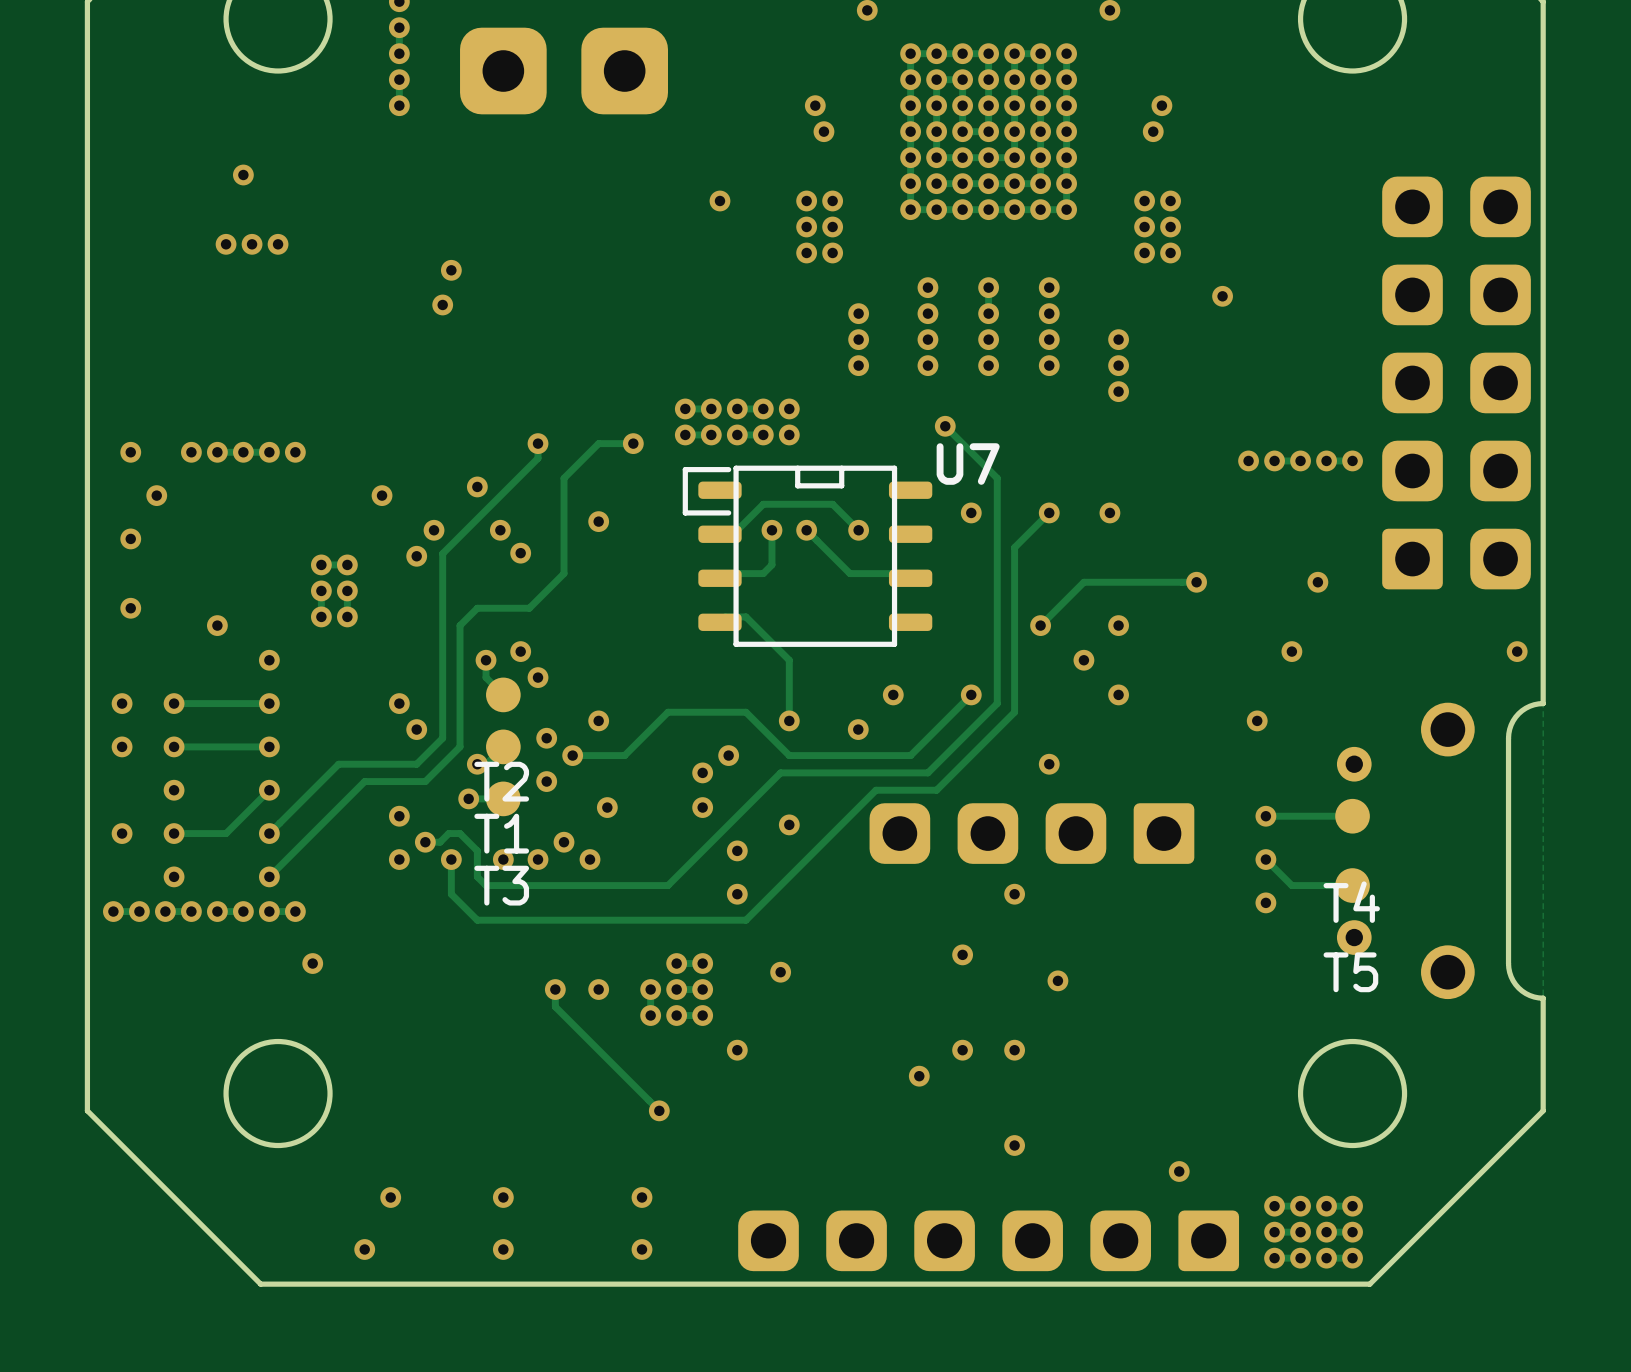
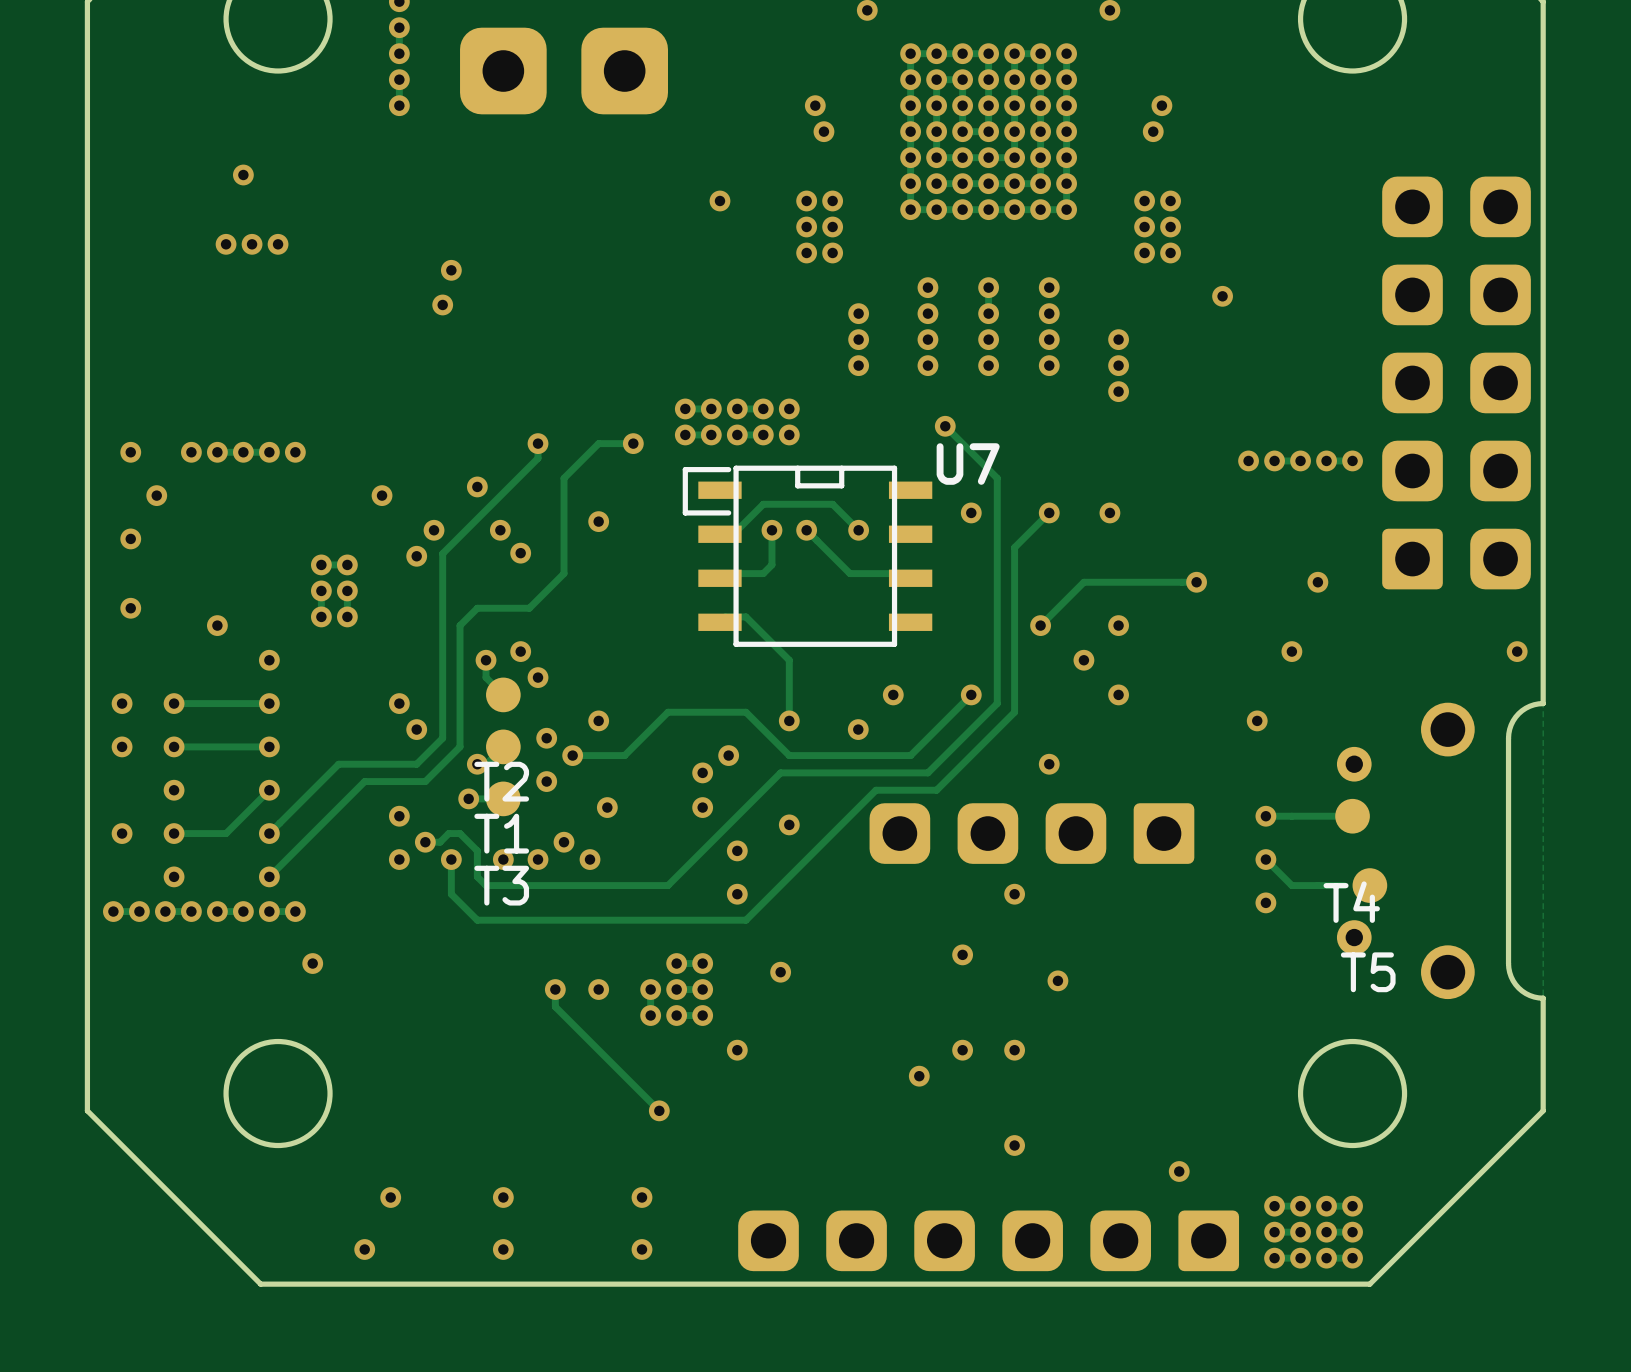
U7 footprint: [682, 465, 933, 647] -> [682, 465, 933, 647]
T5 position: (1352, 885) -> (1369, 885)

